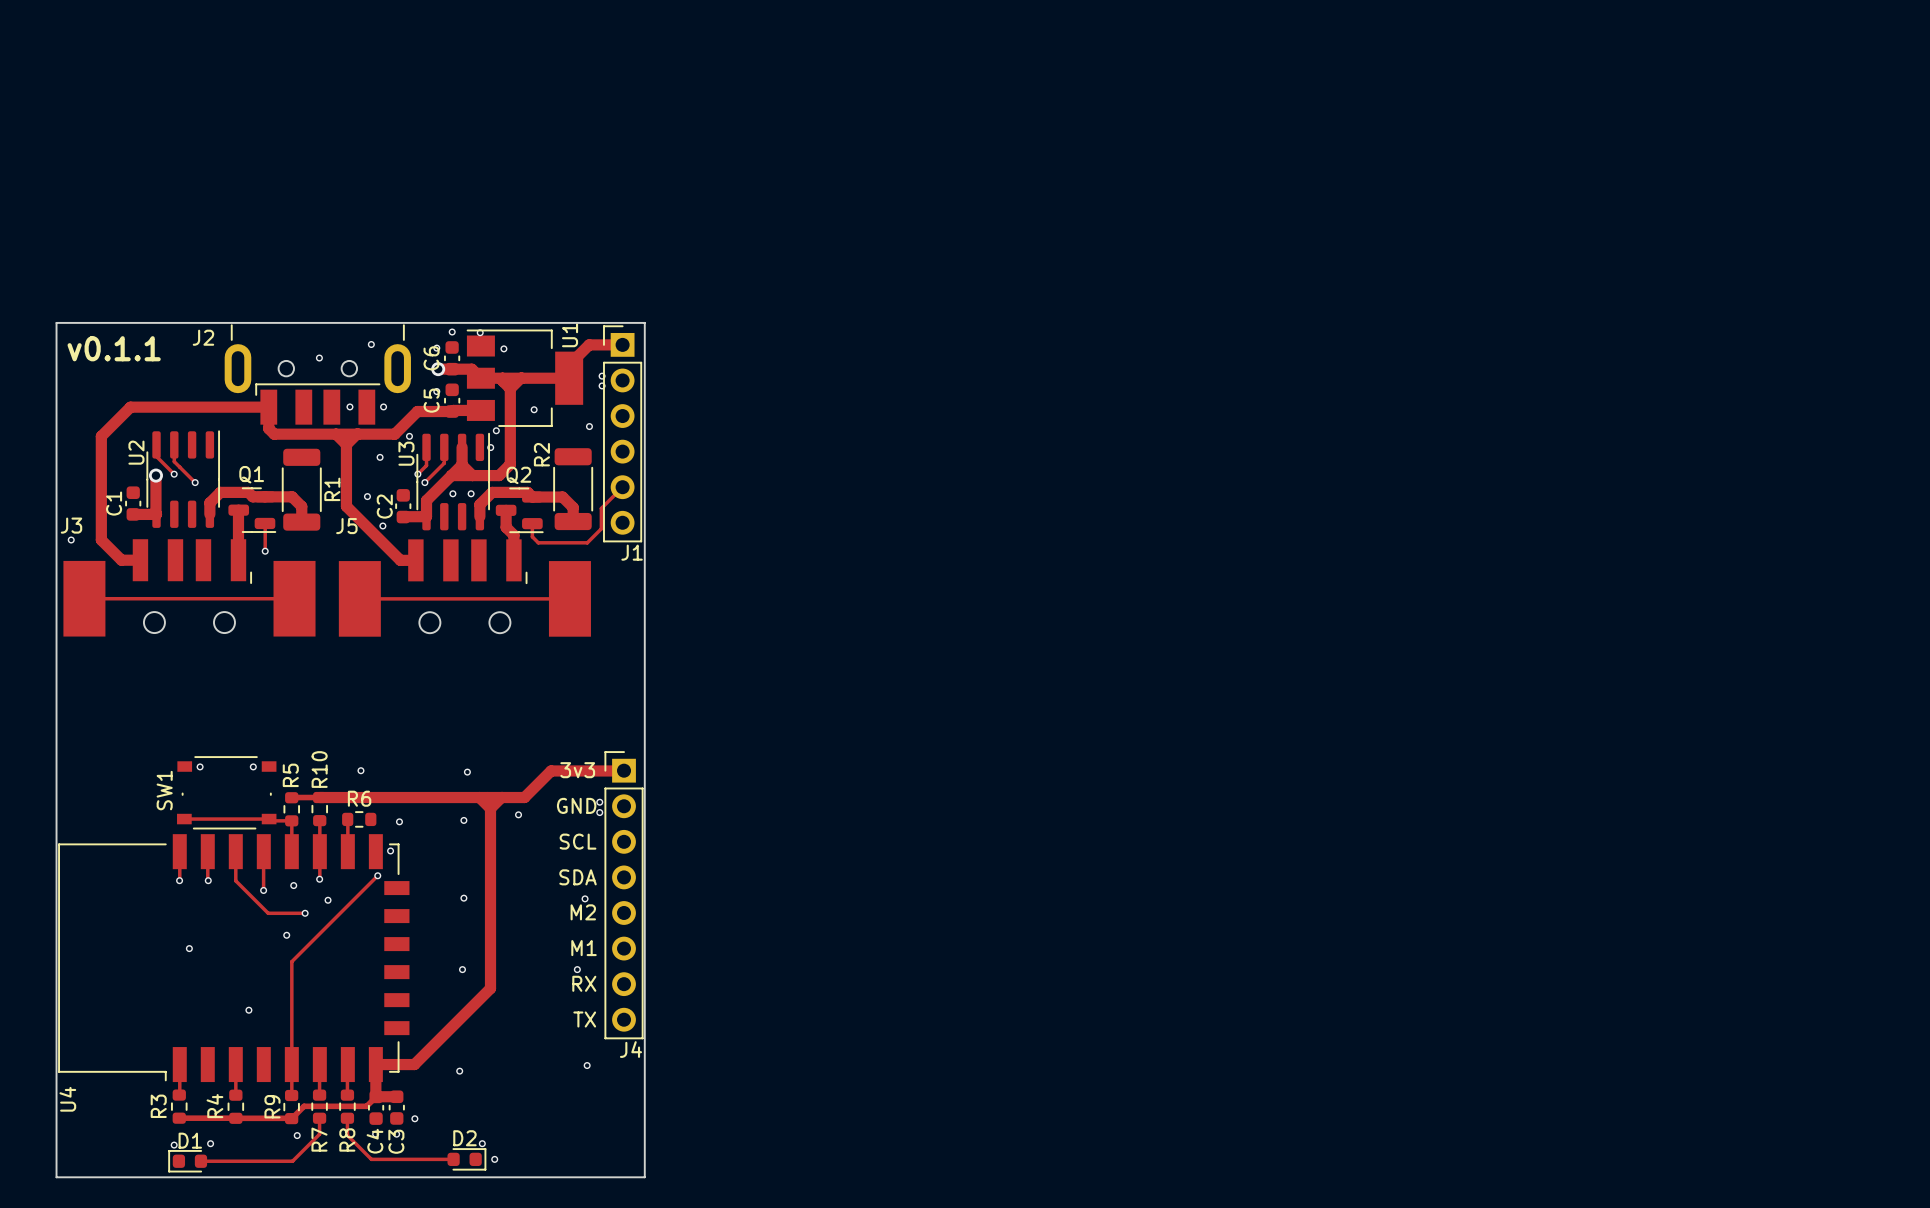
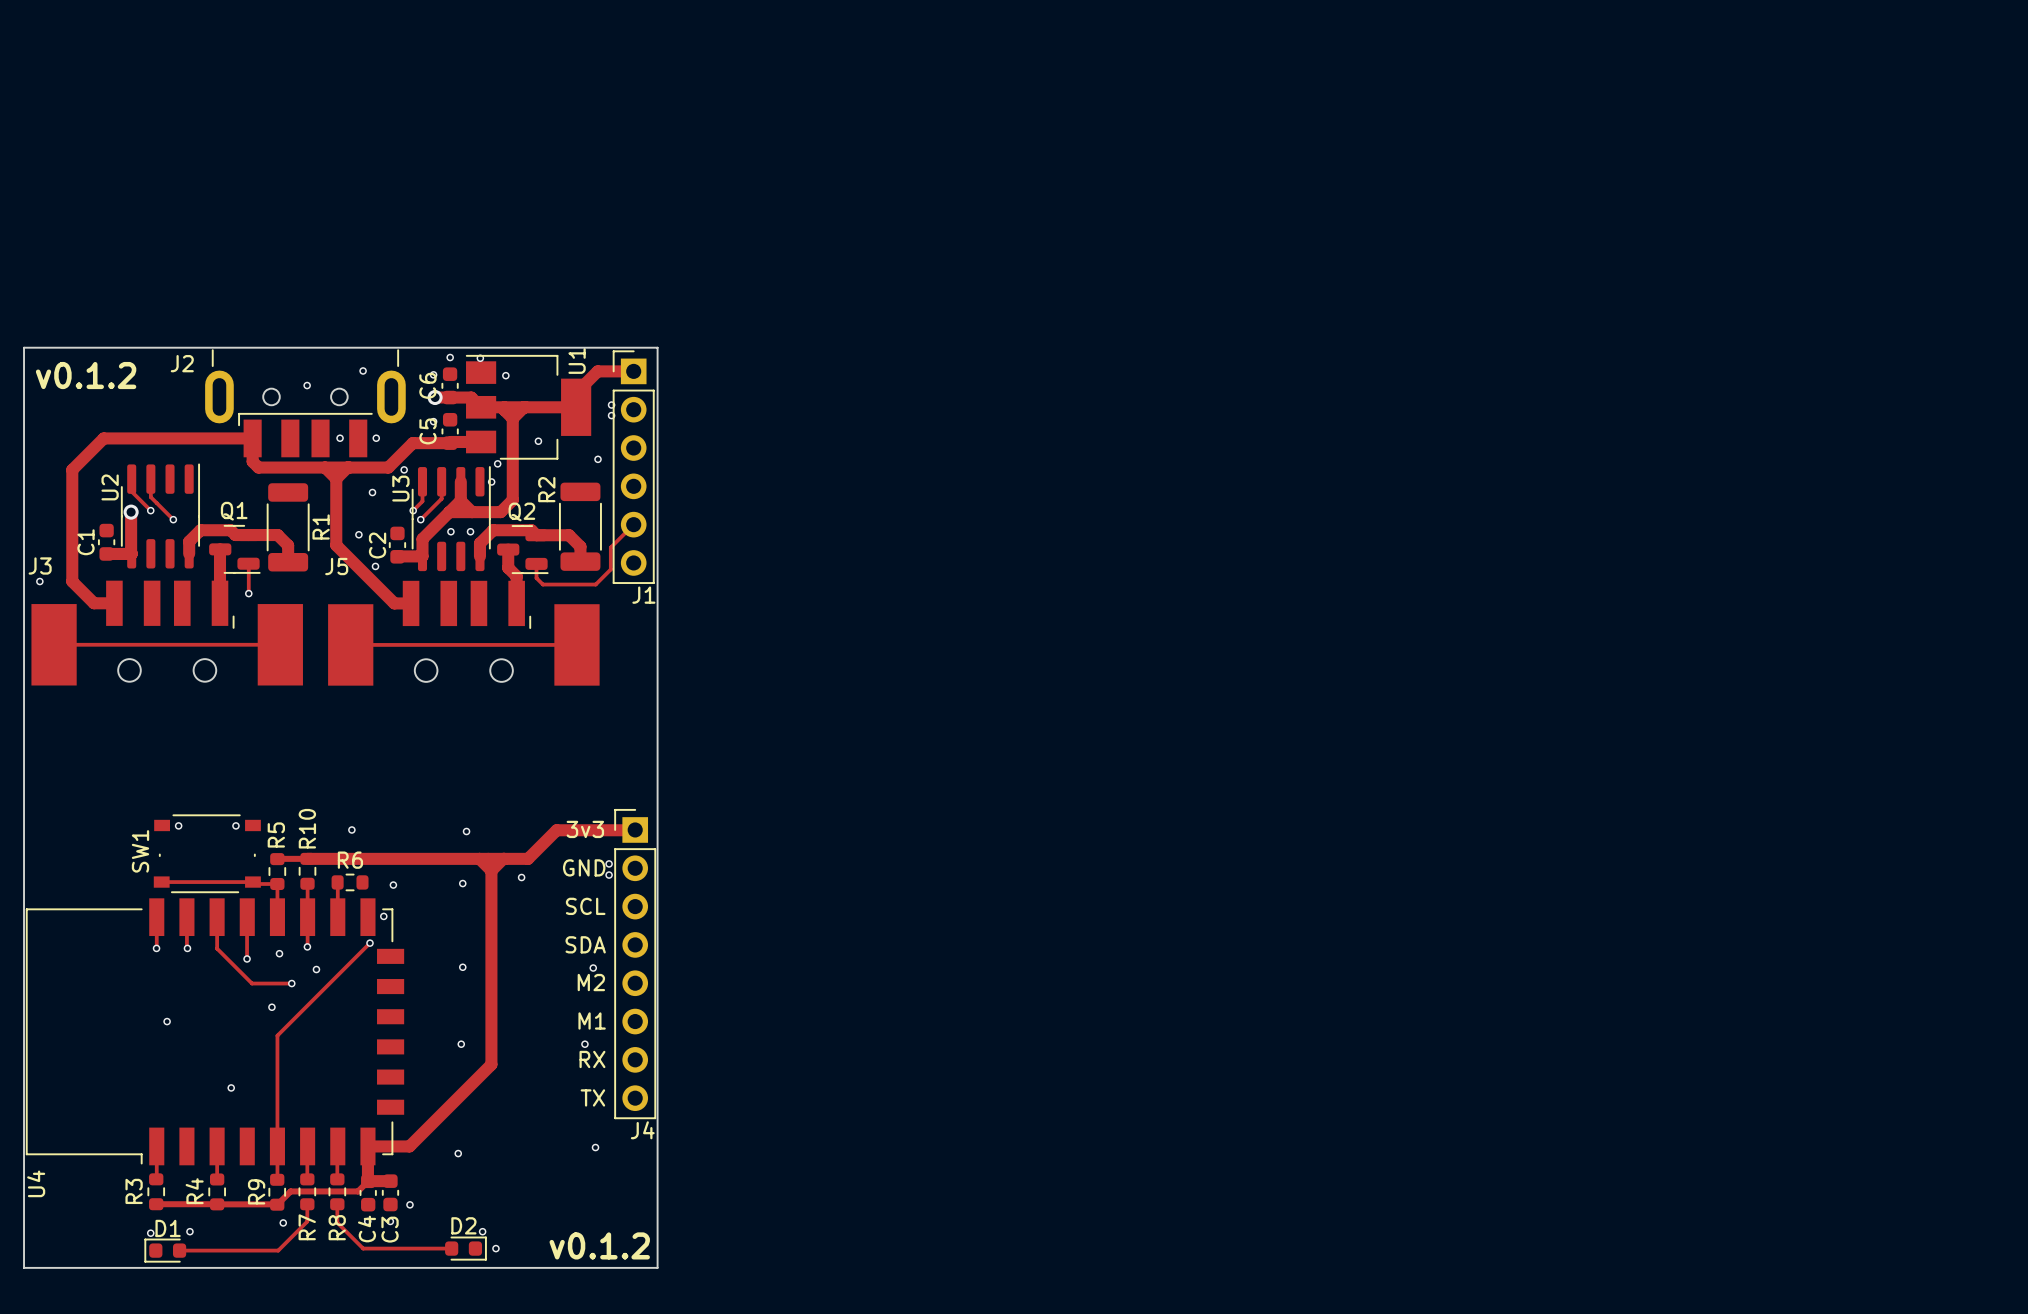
text: v0.1.1 (114, 348) -> v0.1.2 (86, 375)
text: none -> v0.1.2 (599, 1245)

